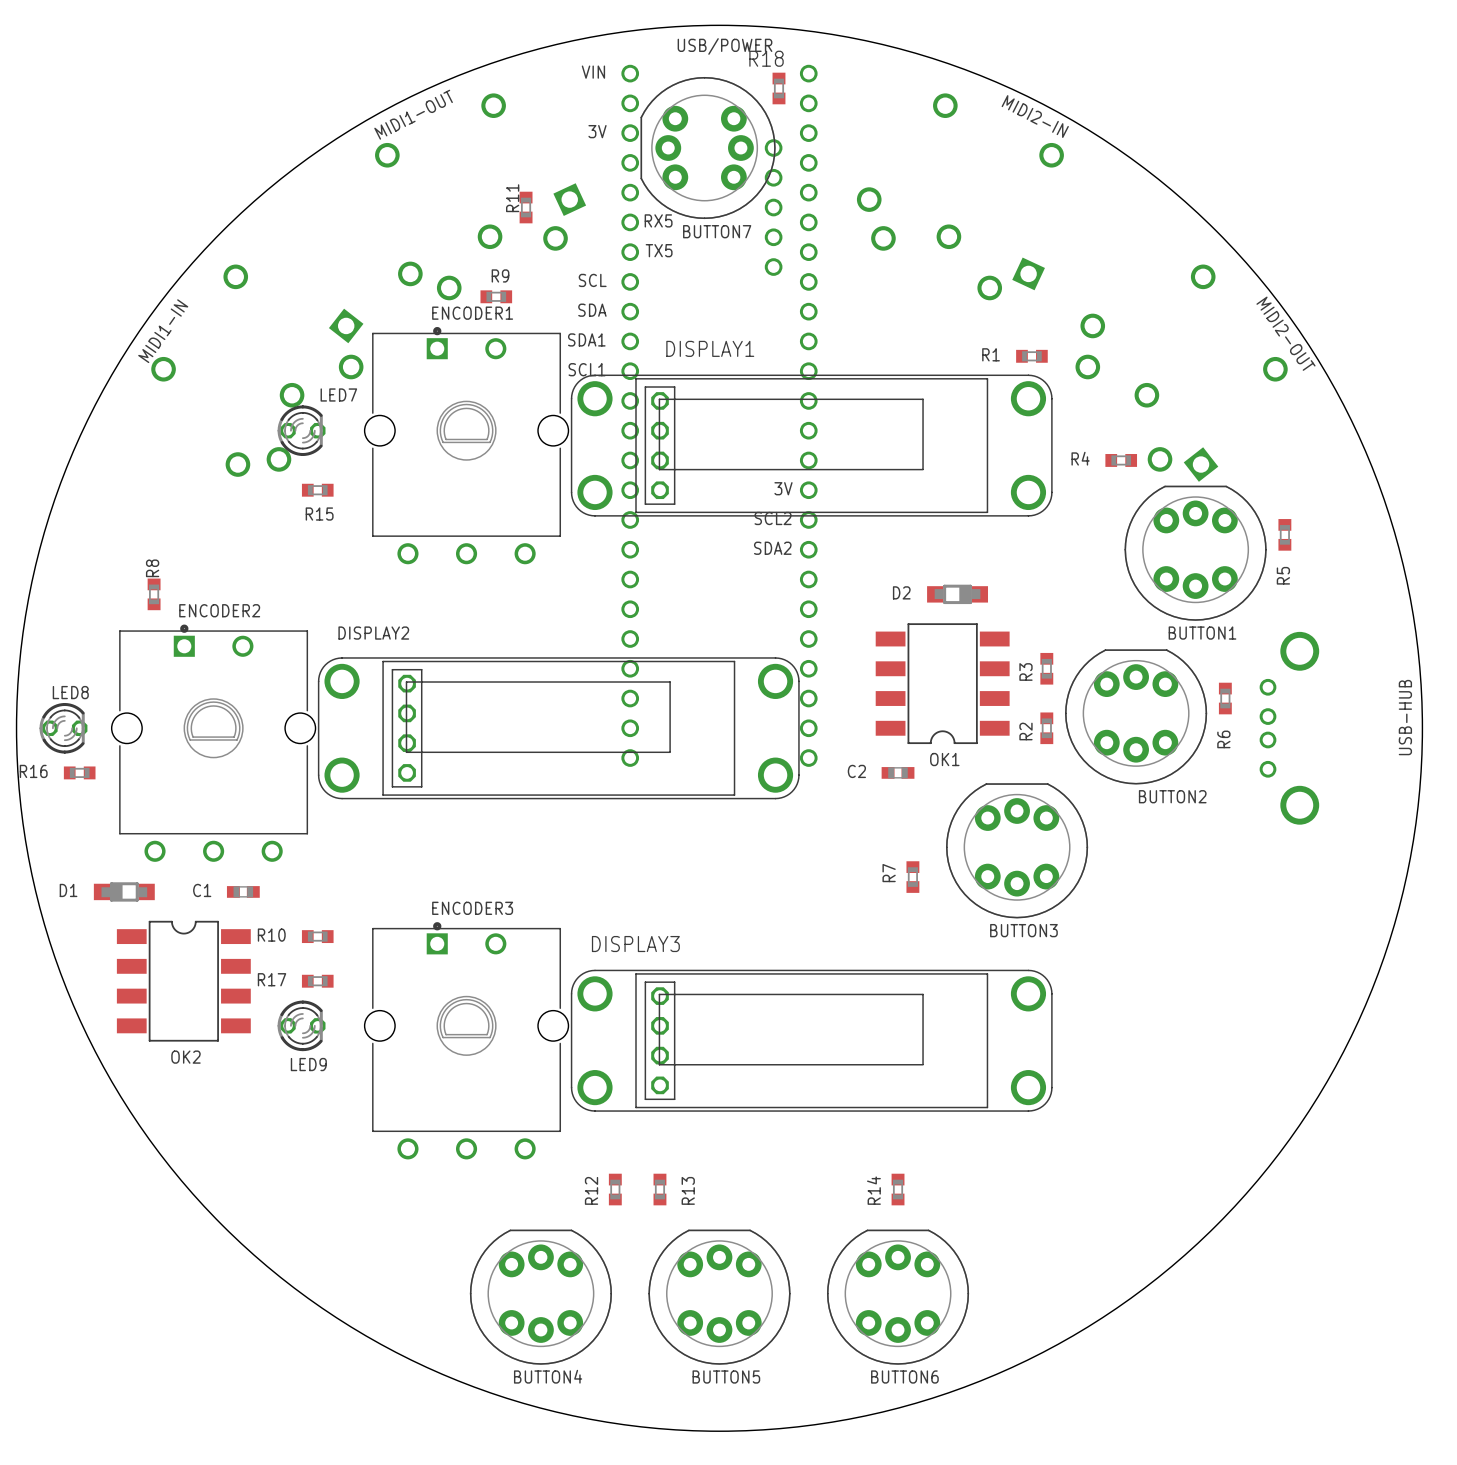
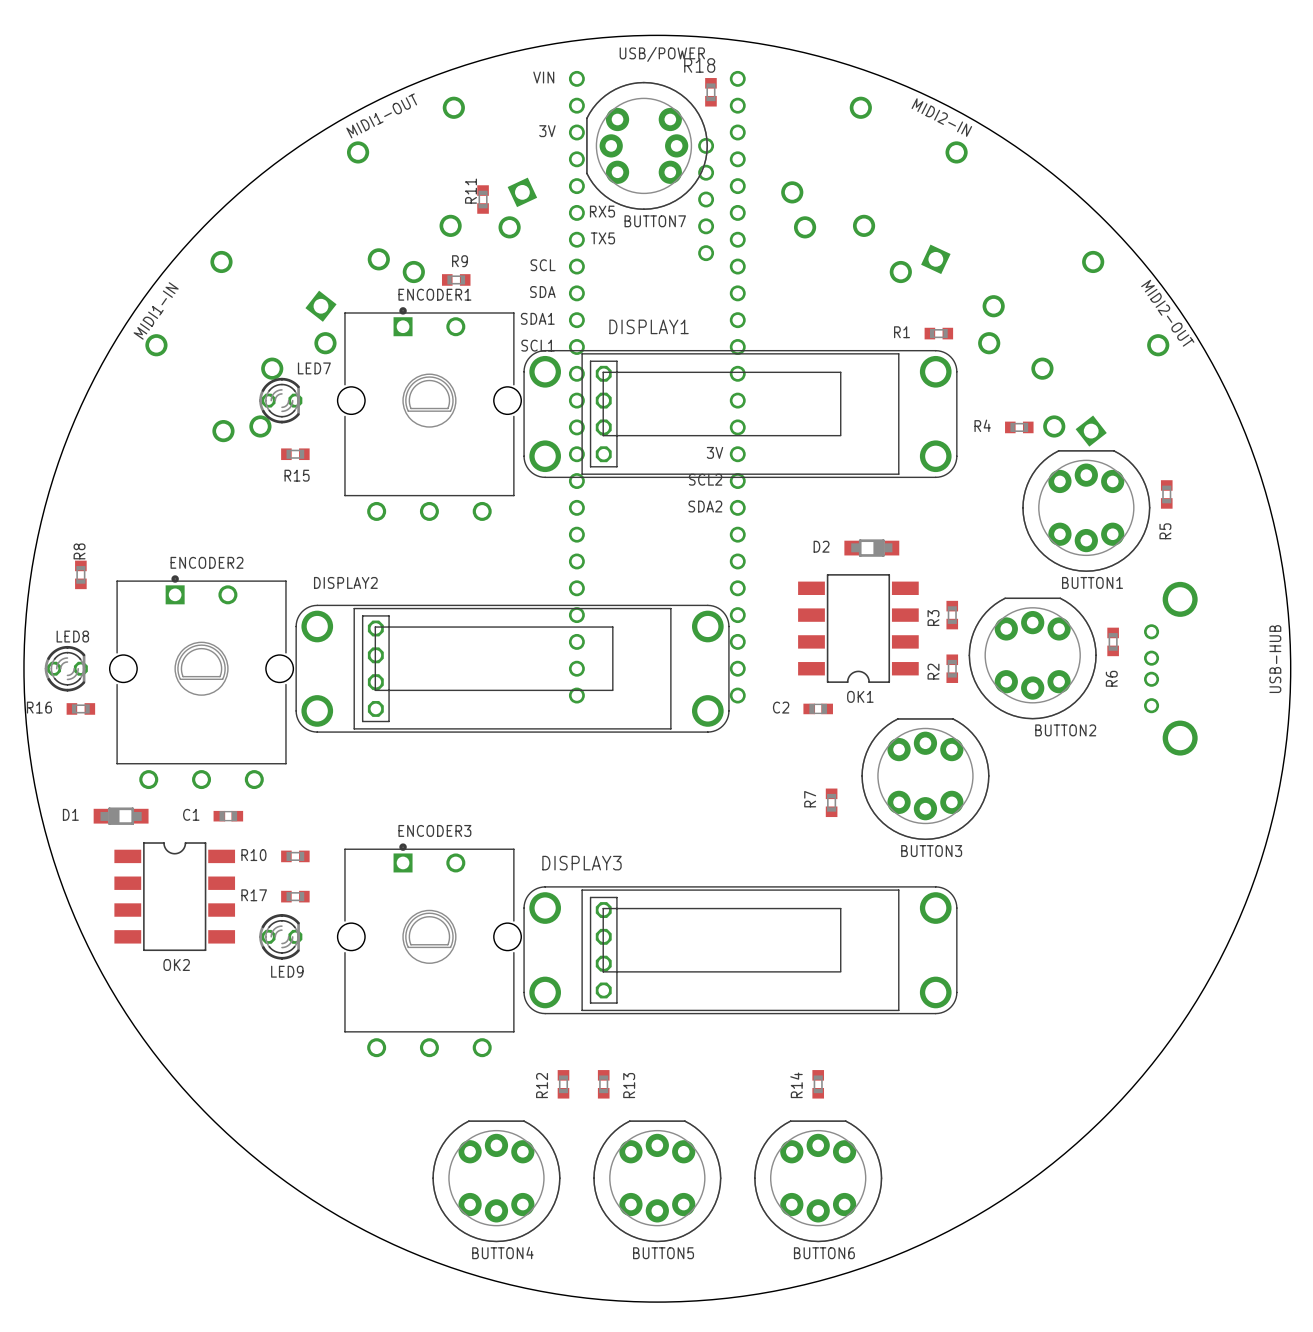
R8 position: (154, 594) -> (80, 574)

